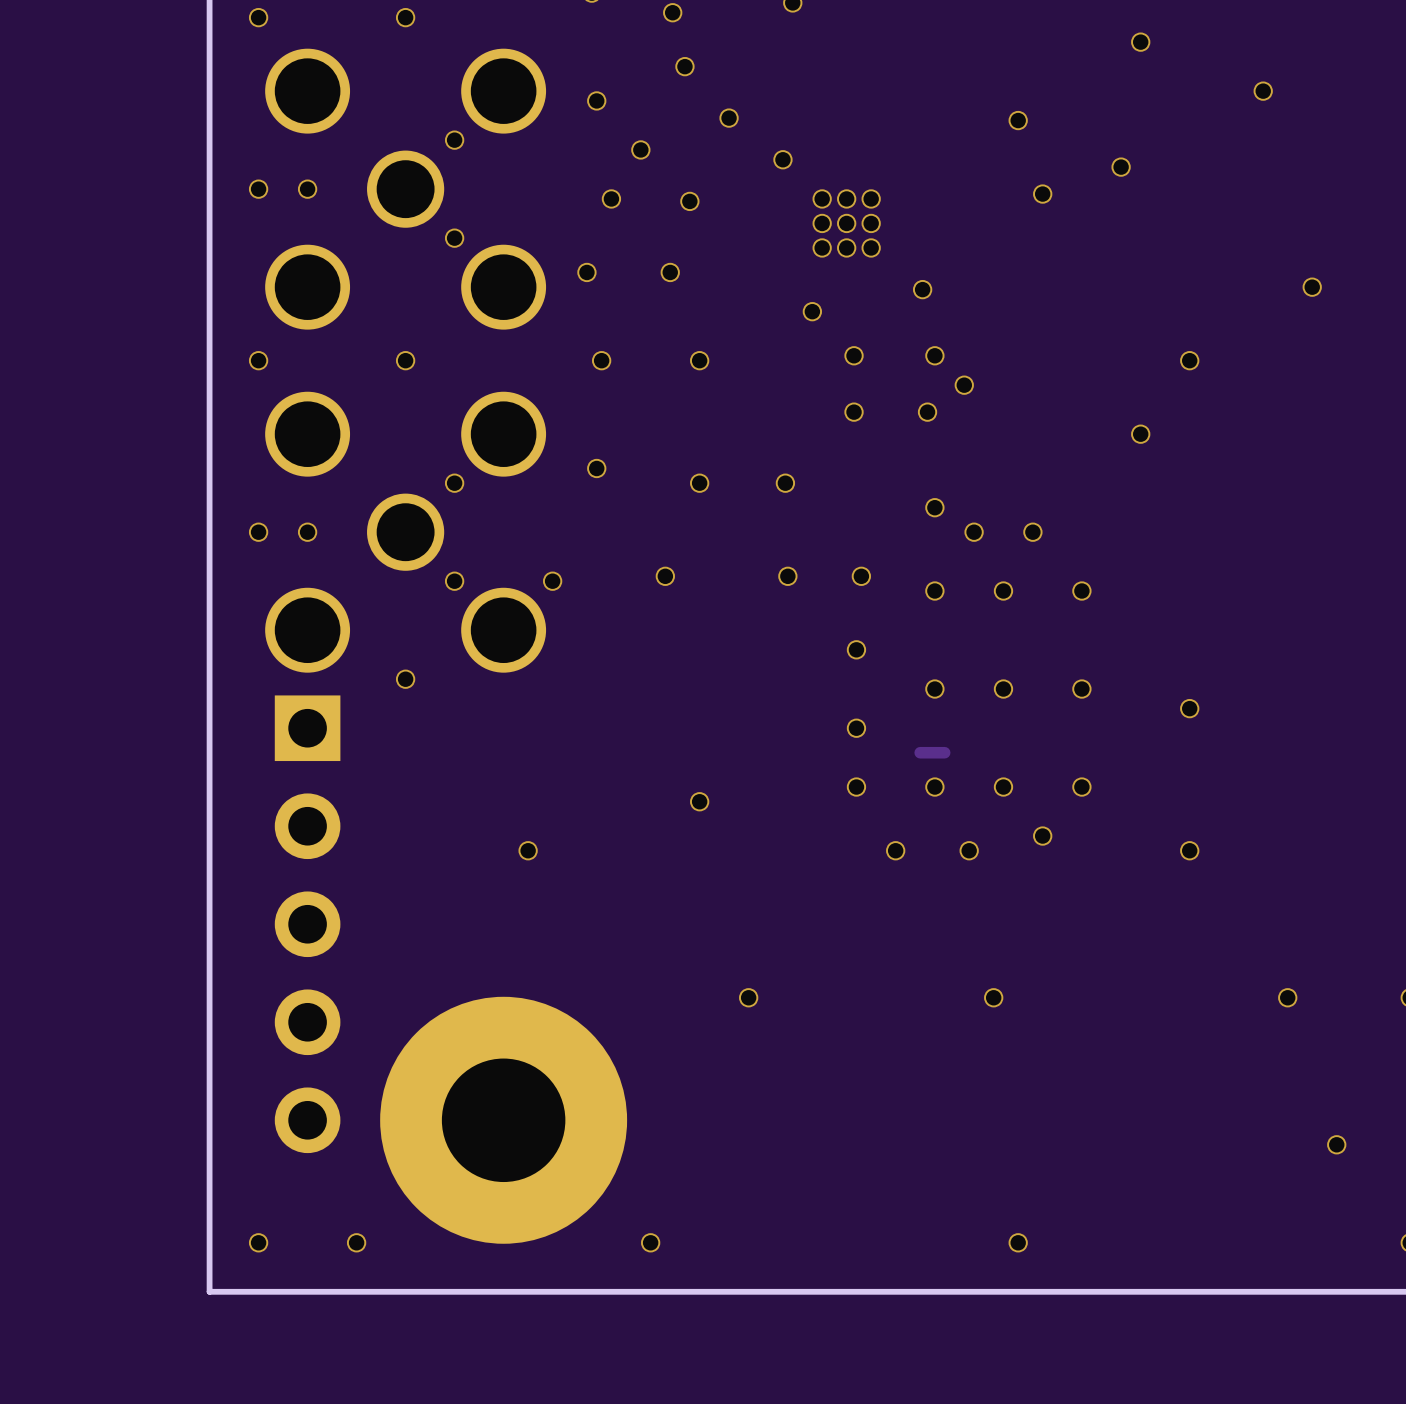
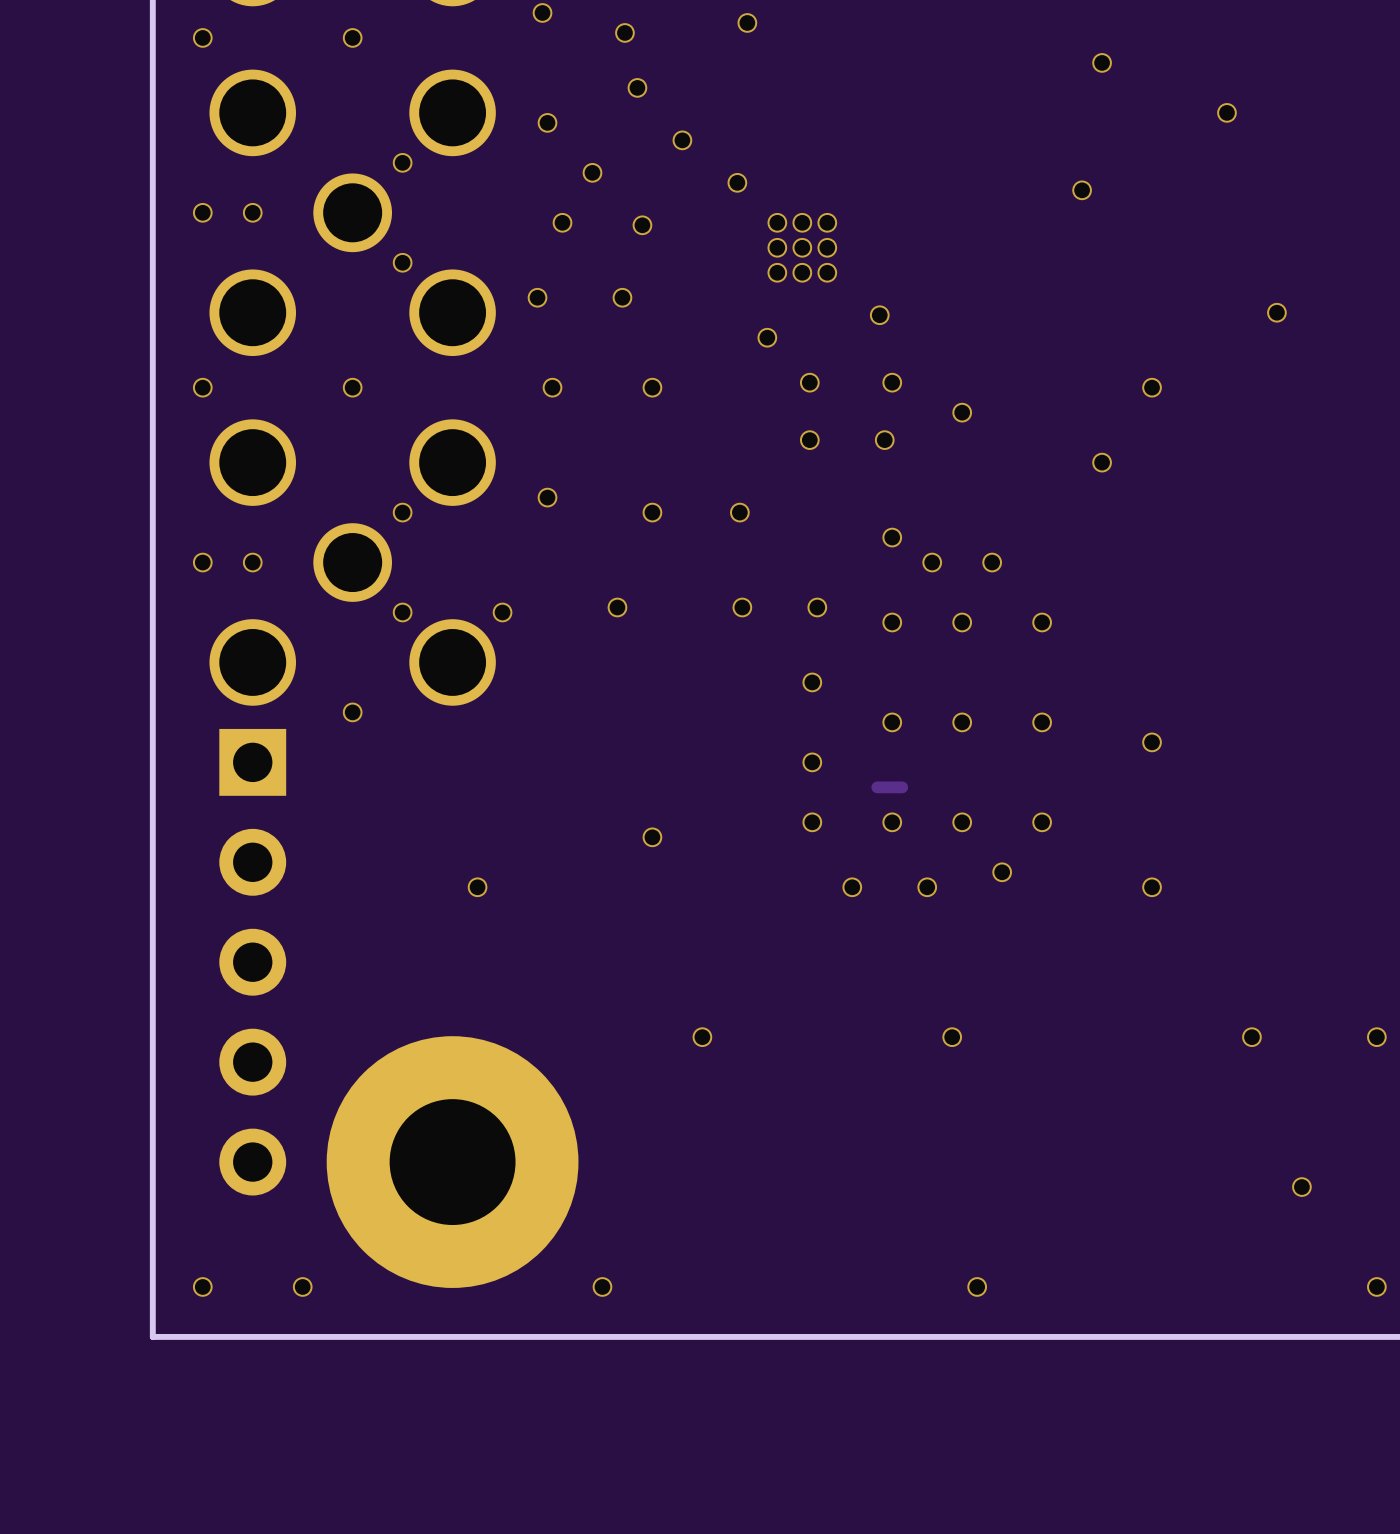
via: (1018, 120) -> none
via: (1042, 194) -> none
via position: (964, 385) -> (962, 412)

